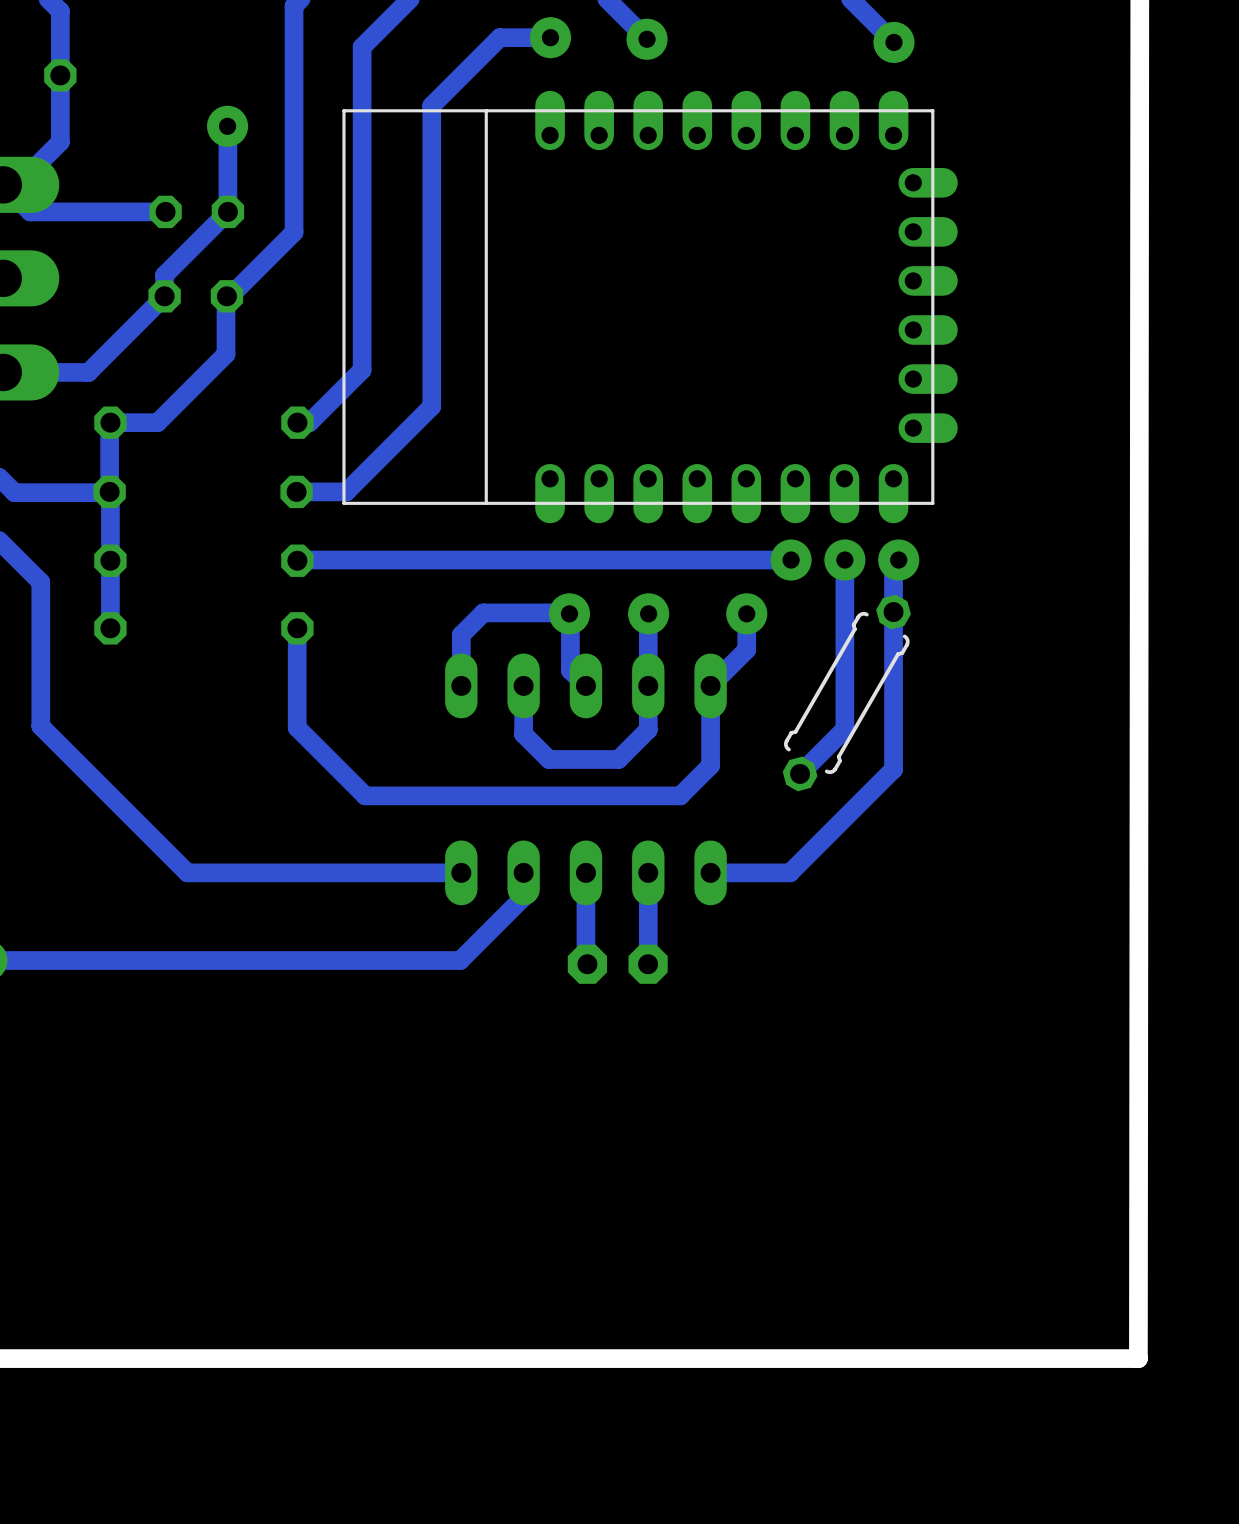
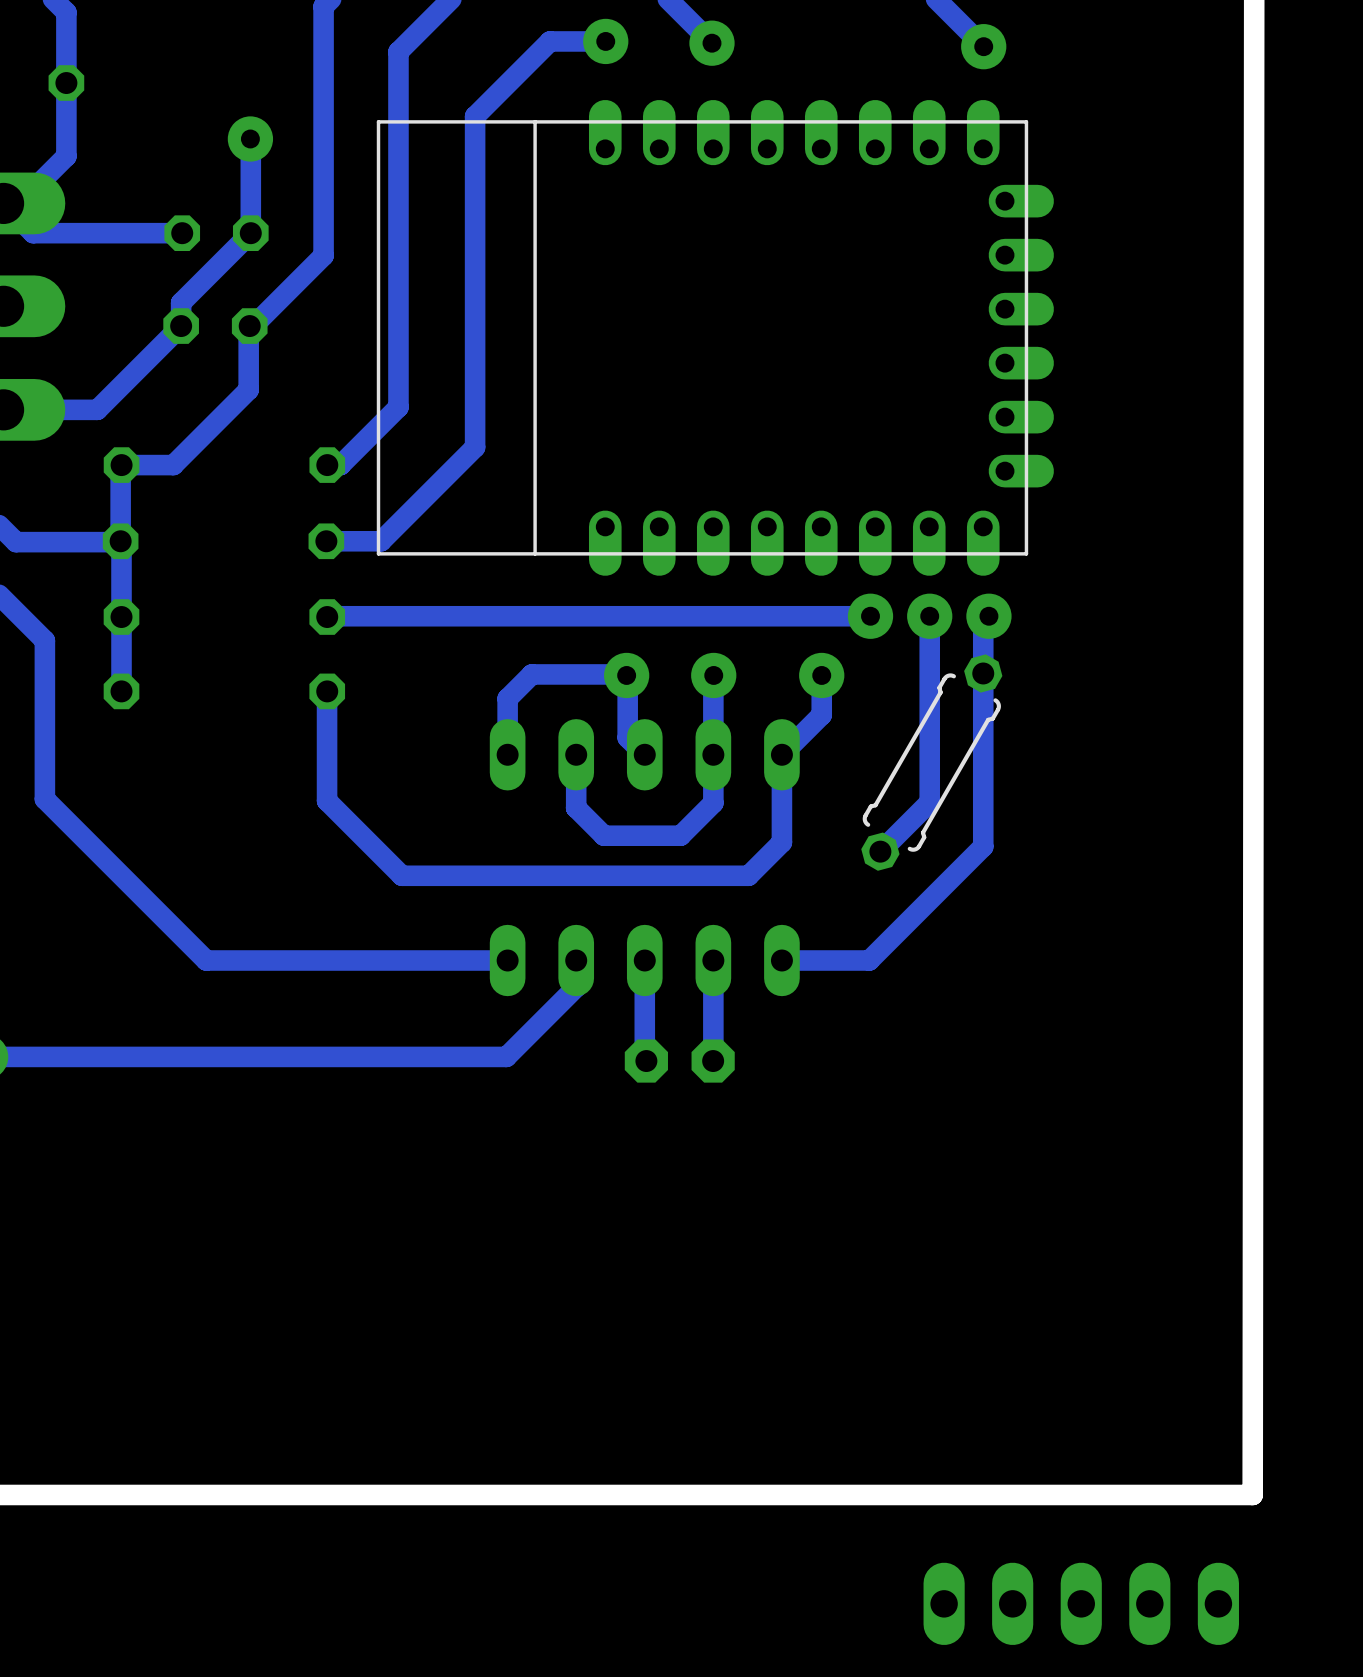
part: none -> (1081, 1603)

